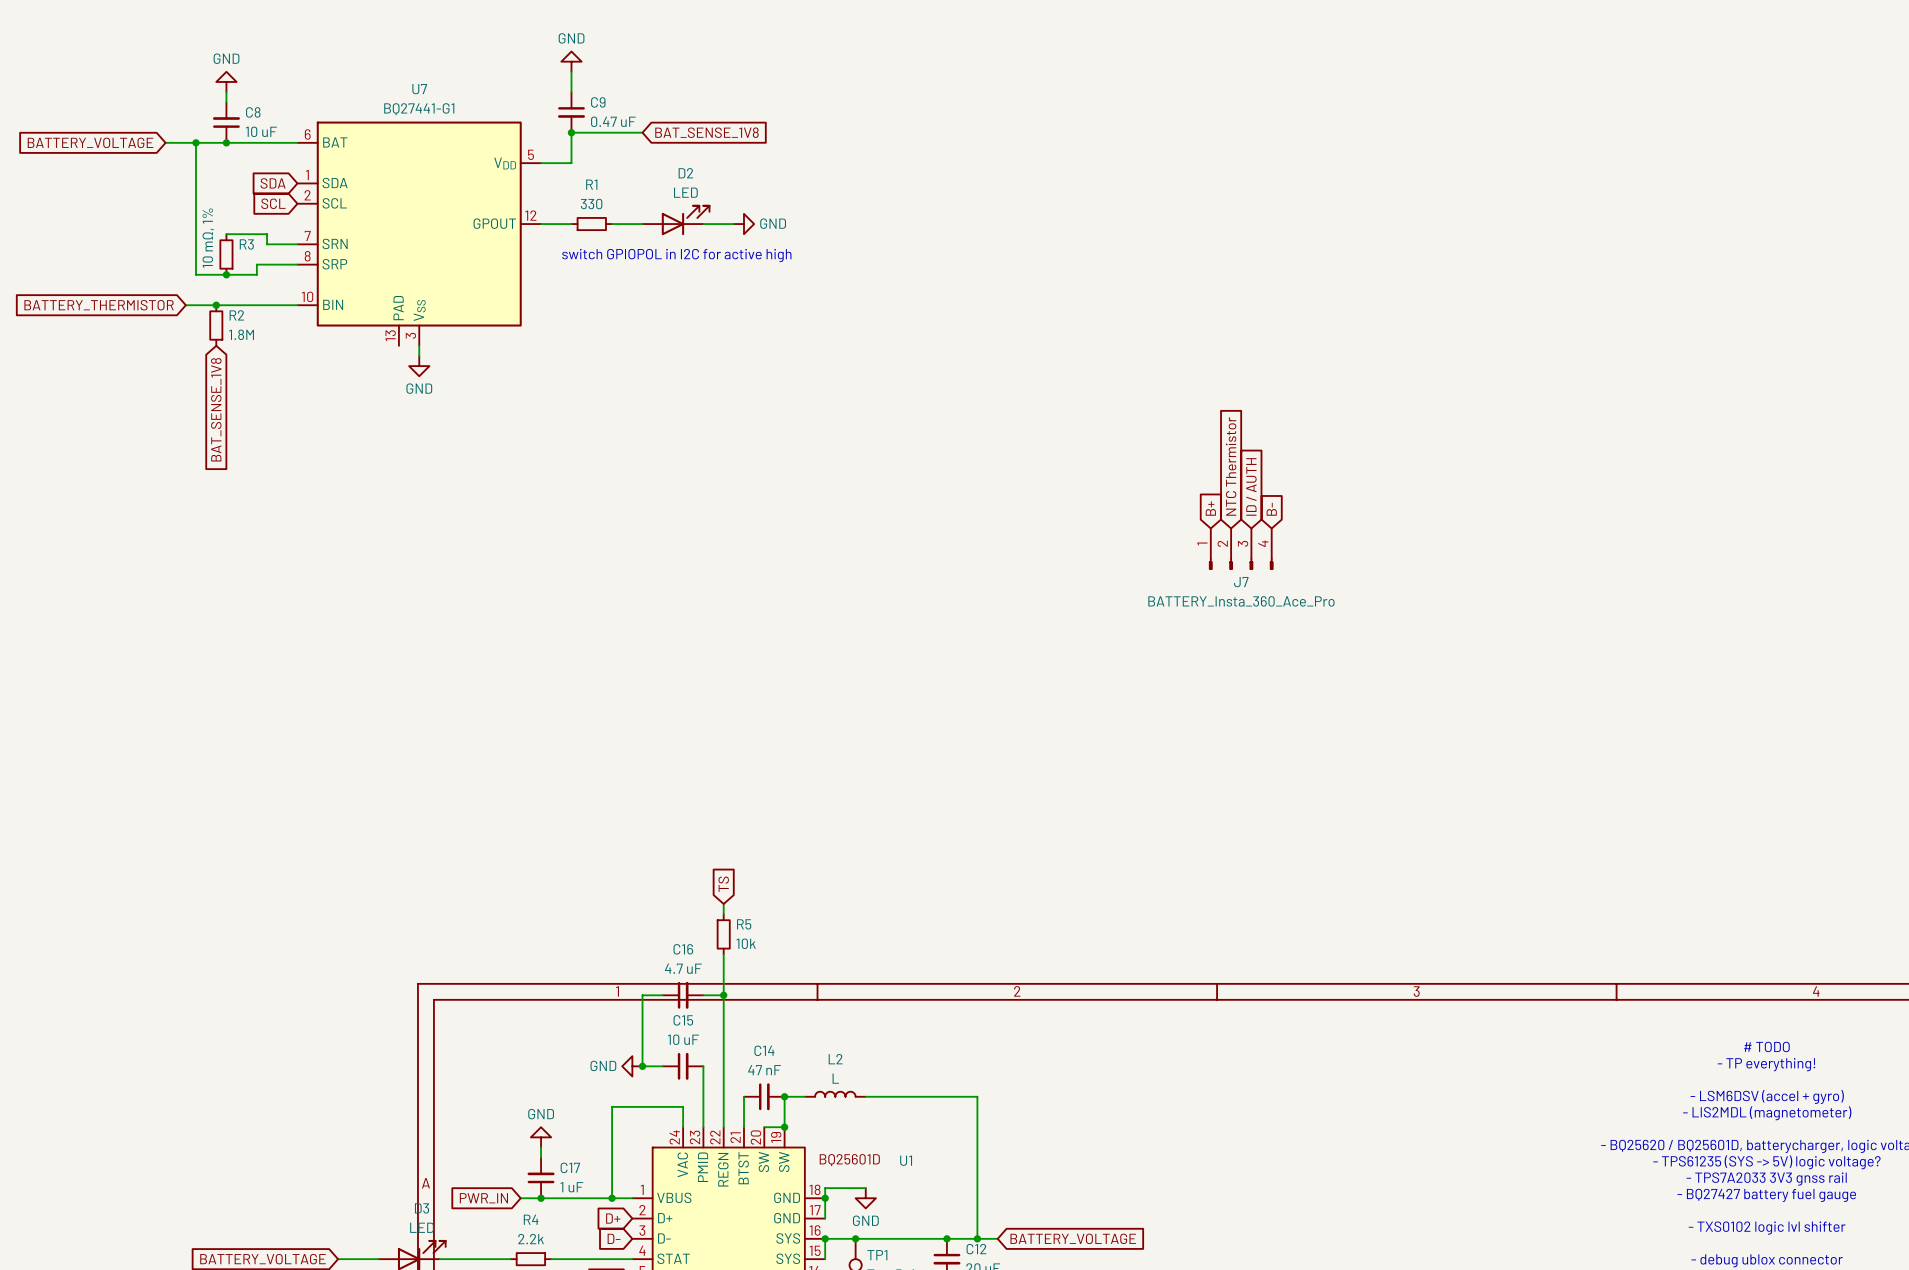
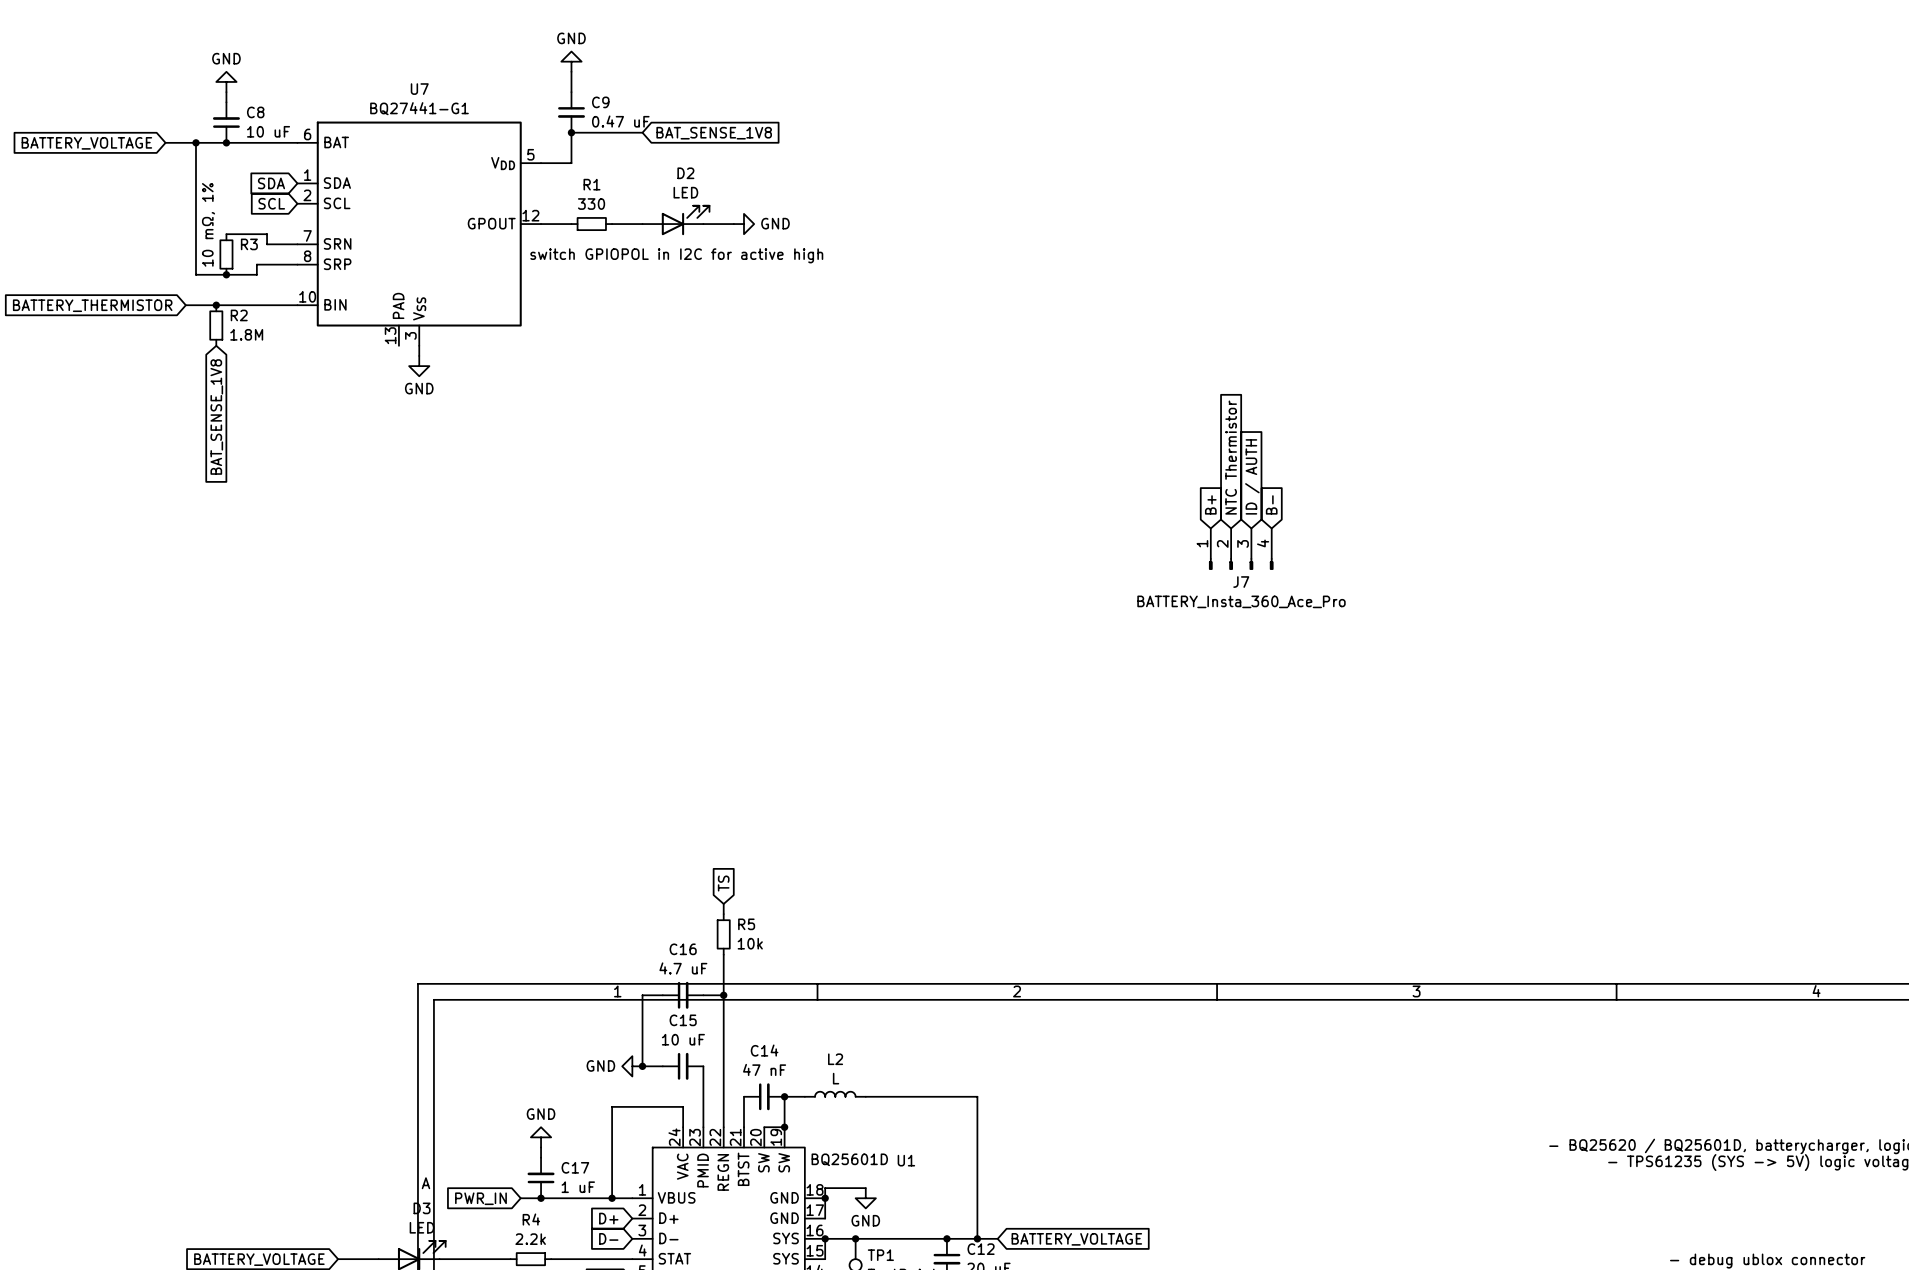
text: # TODO (1766, 1046) -> none
text: - TP everything! (1766, 1064) -> none
text: - LSM6DSV (accel + gyro) (1767, 1096) -> none
text: - LIS2MDL (magnetometer) (1767, 1113) -> none
text: - TPS7A2033 3V3 gnss rail (1766, 1179) -> none
text: - BQ27427 battery fuel gauge (1766, 1195) -> none
text: - TXS0102 logic lvl shifter (1767, 1228) -> none

